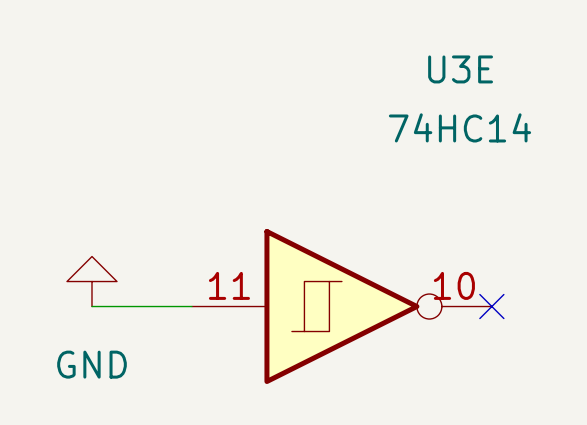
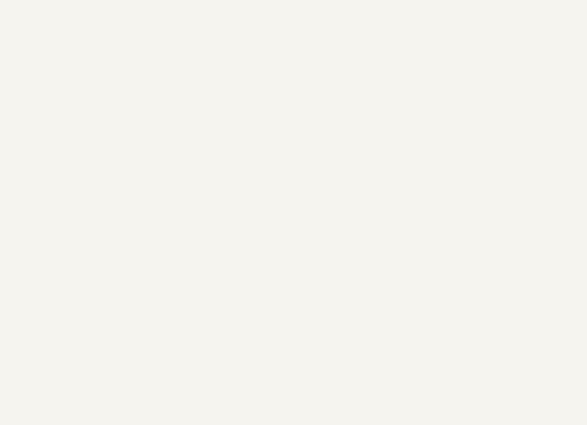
power symbol: GND (91, 281) -> none
wire: (91, 306) (191, 306) -> none
U3E: 74HC14 (341, 306) -> none
no-connect mark: (491, 306) -> none

